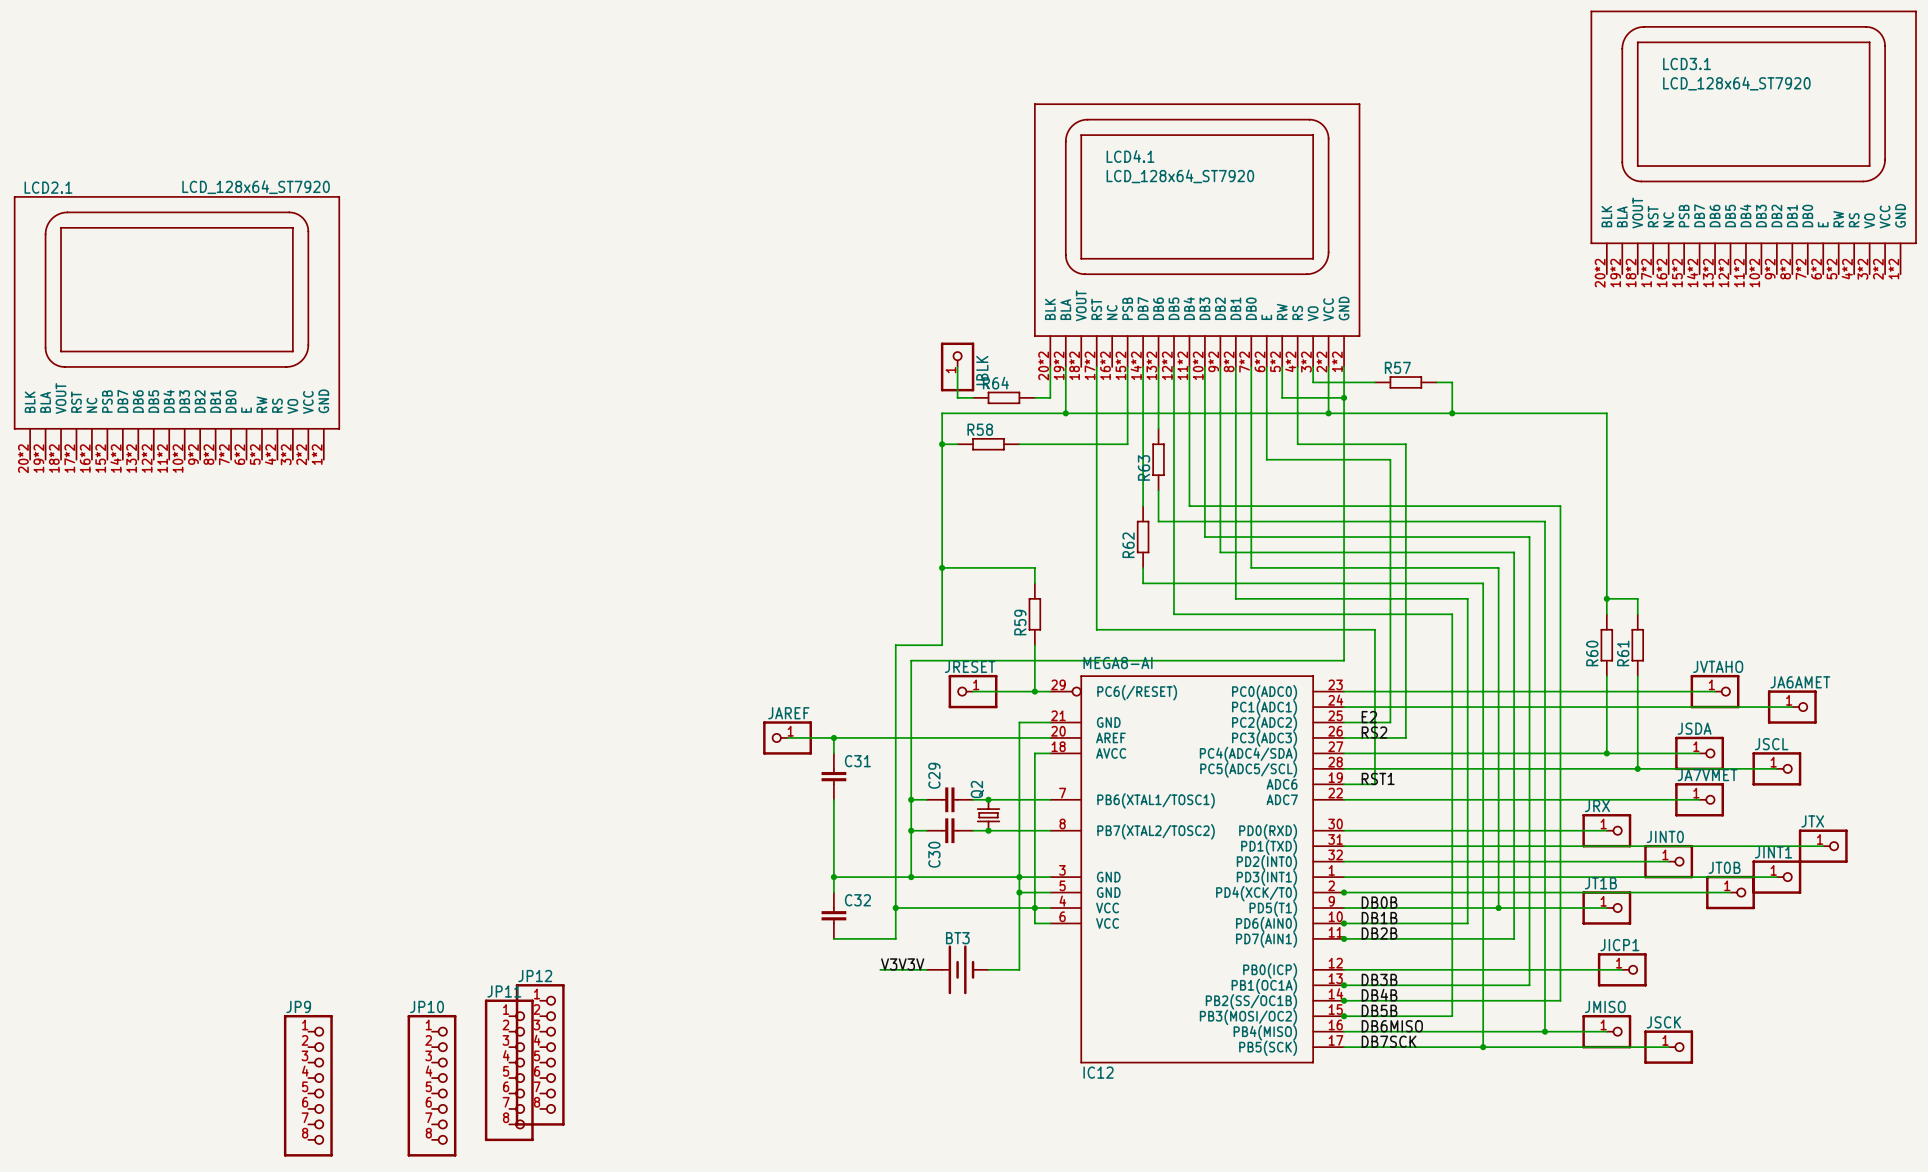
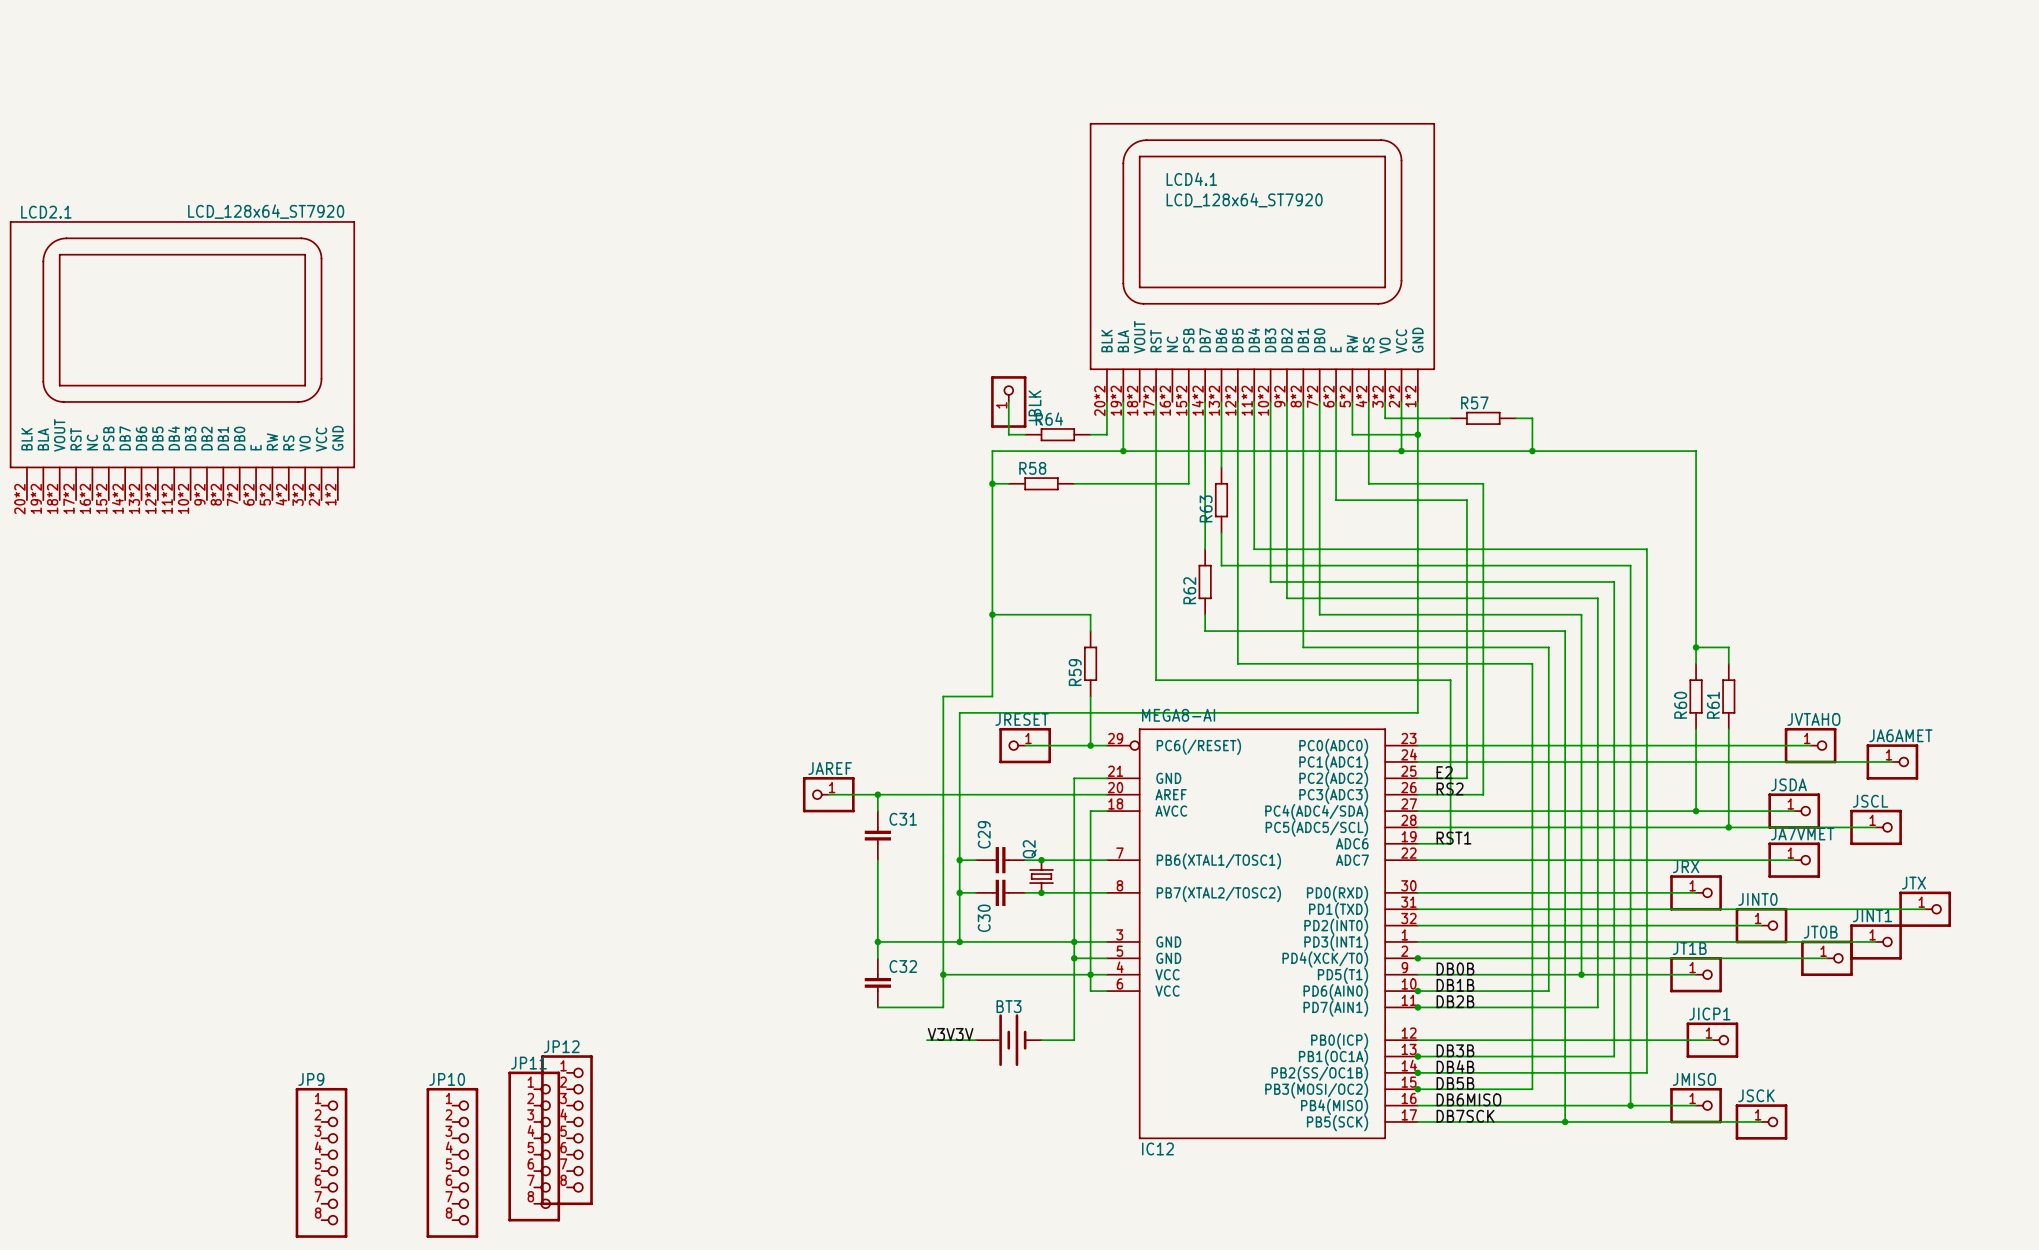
LCD3.1: LCD_128x64_ST7920 (1753, 142) -> none

